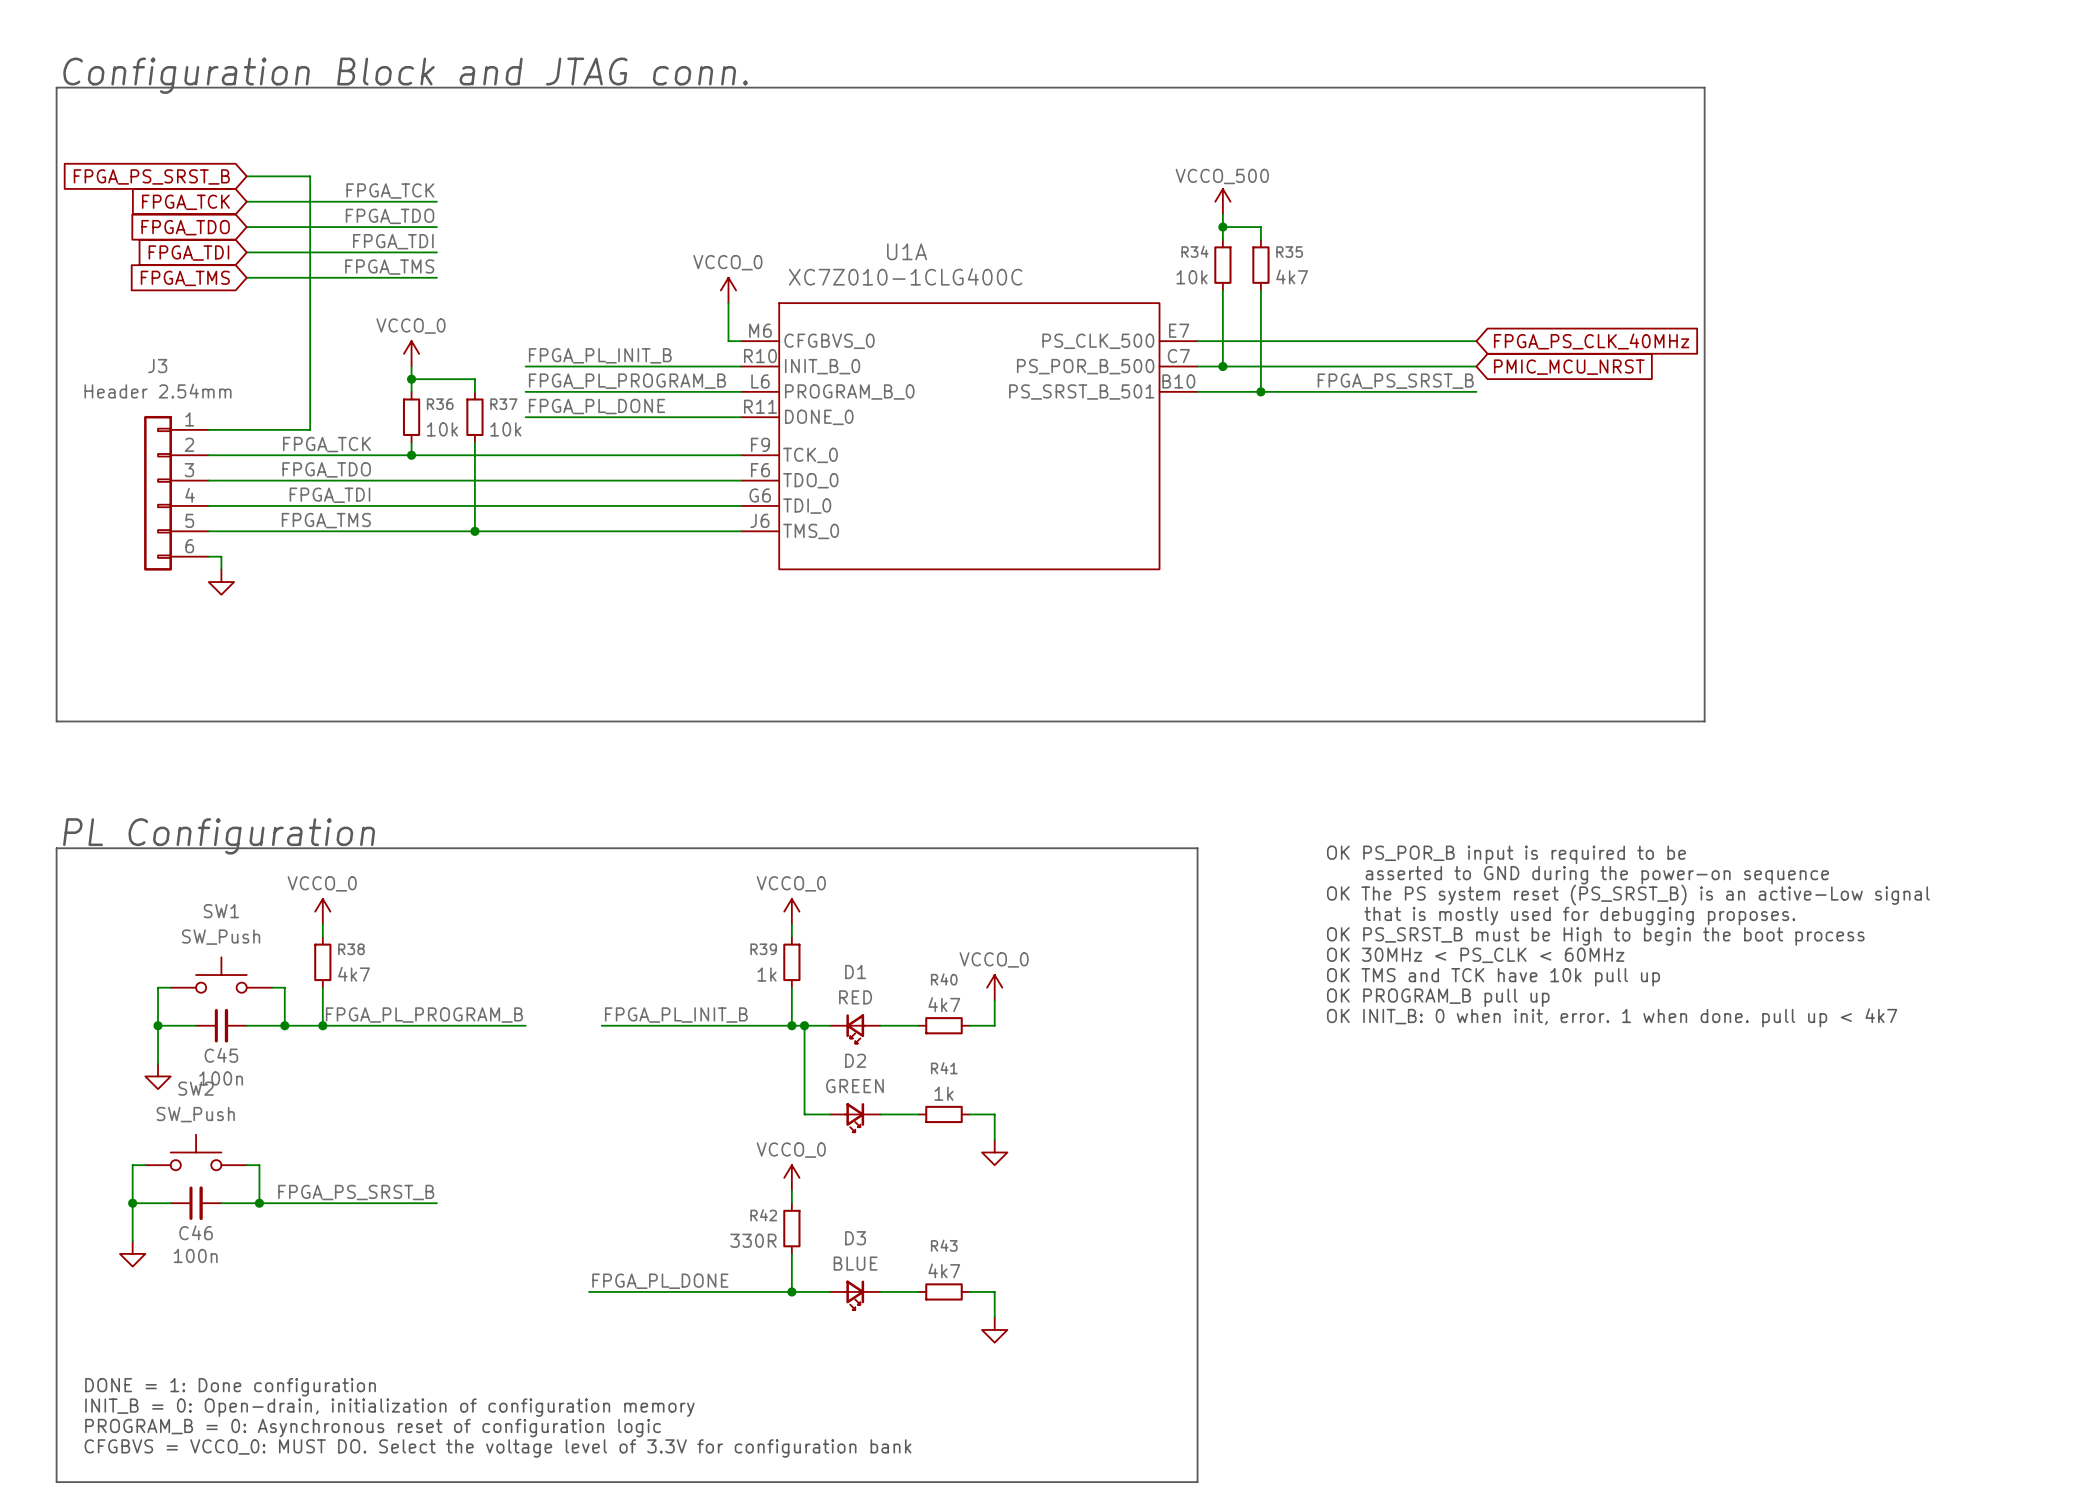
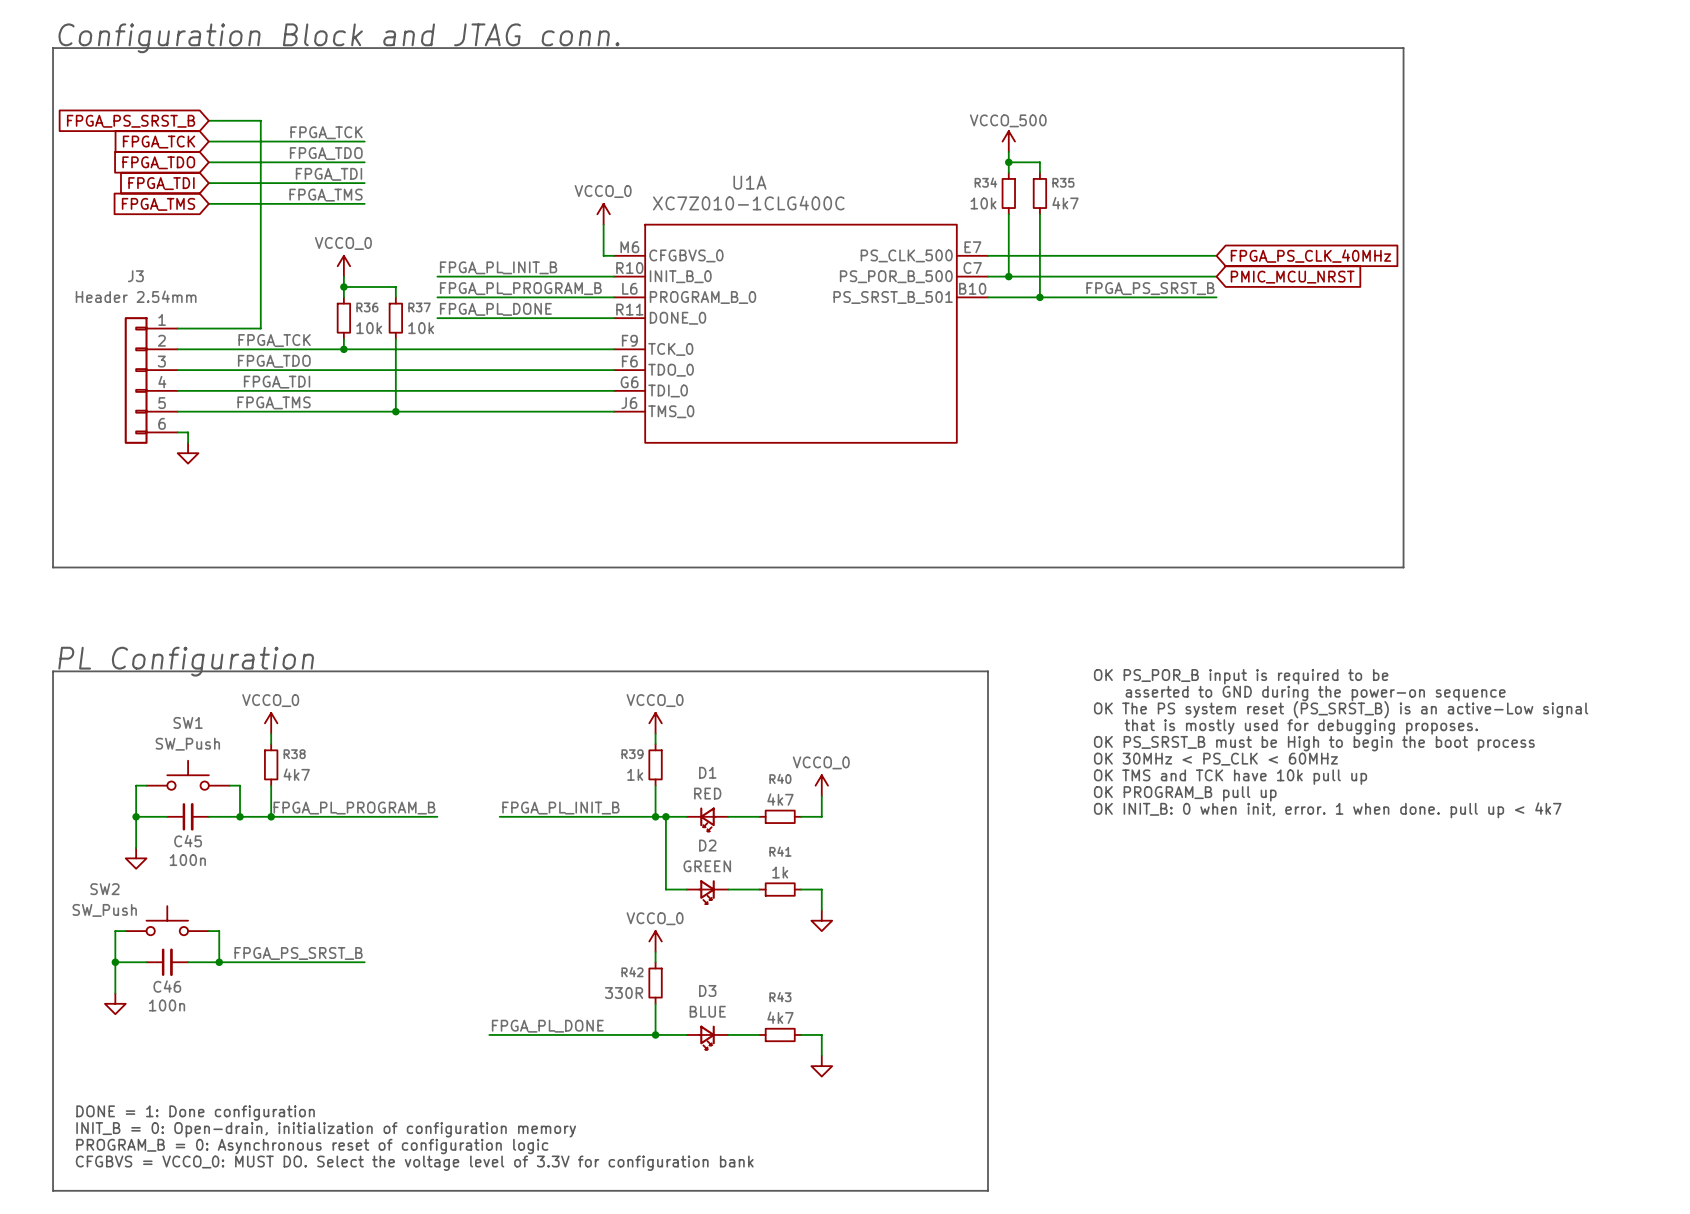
SW2 name position: SW2 (196, 1088) -> SW2 (104, 889)
SW2 value position: SW_Push (195, 1114) -> SW_Push (104, 910)

